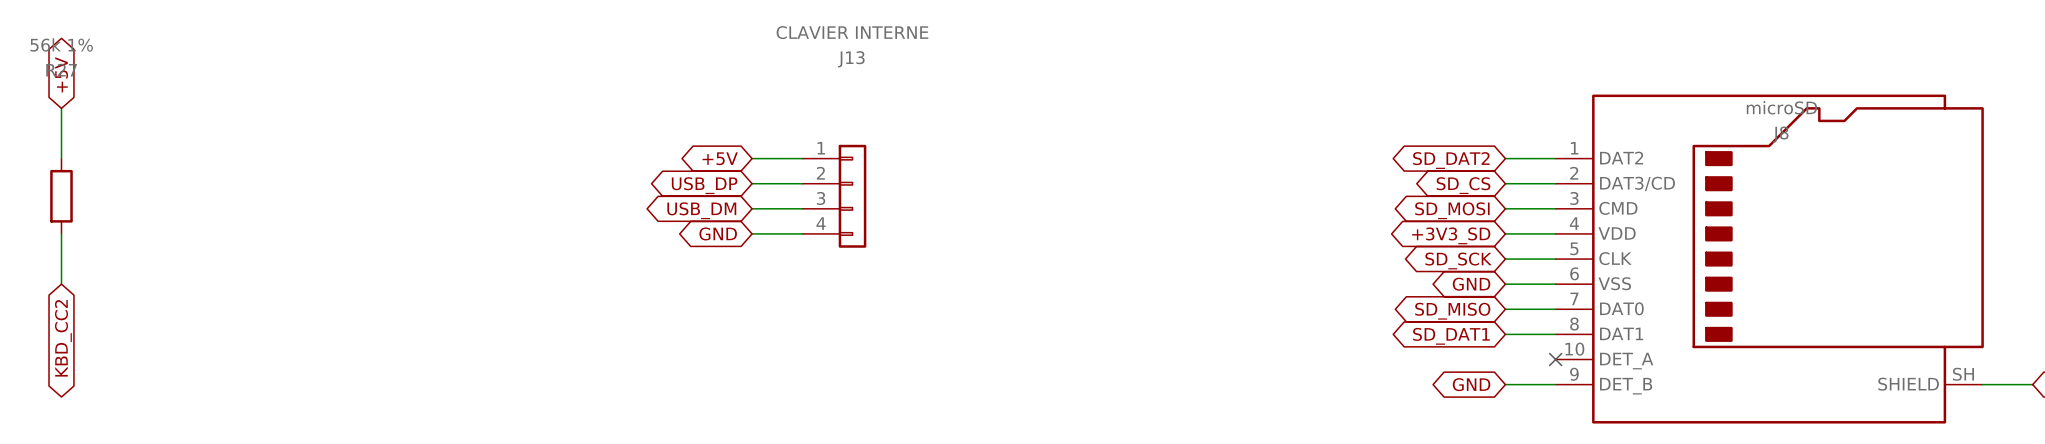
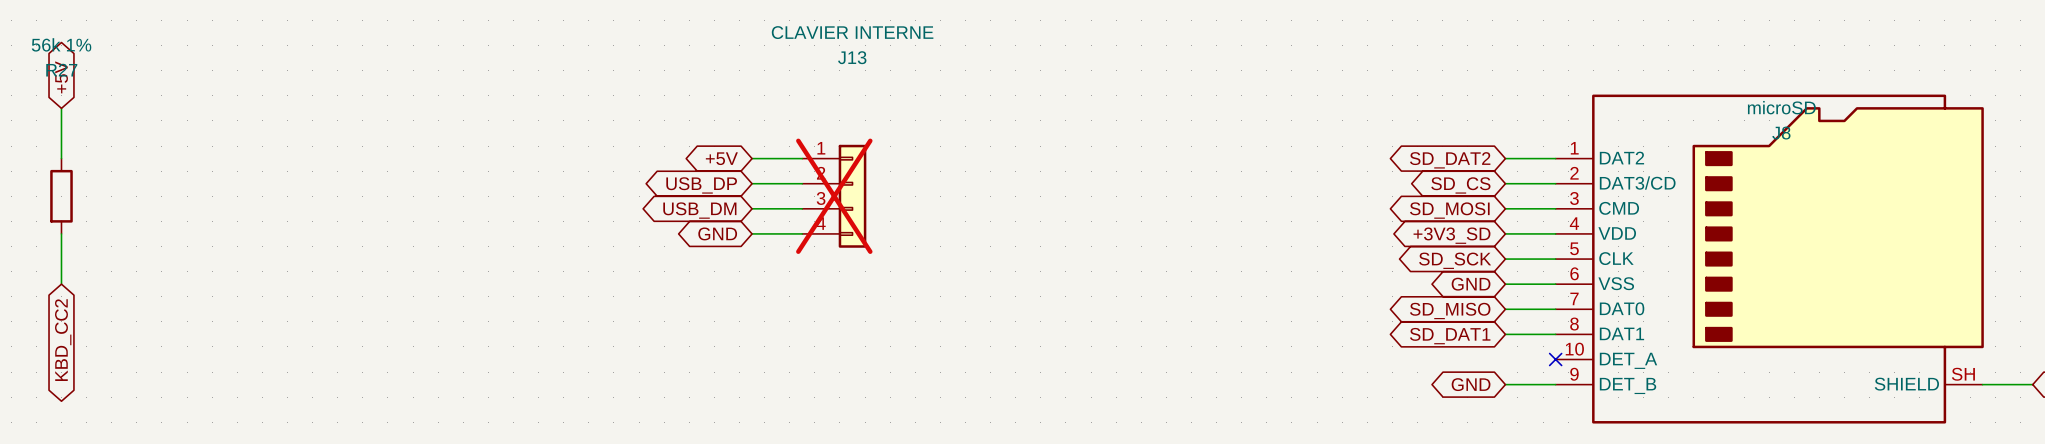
J13 do-not-place cross: none -> (834, 196)

